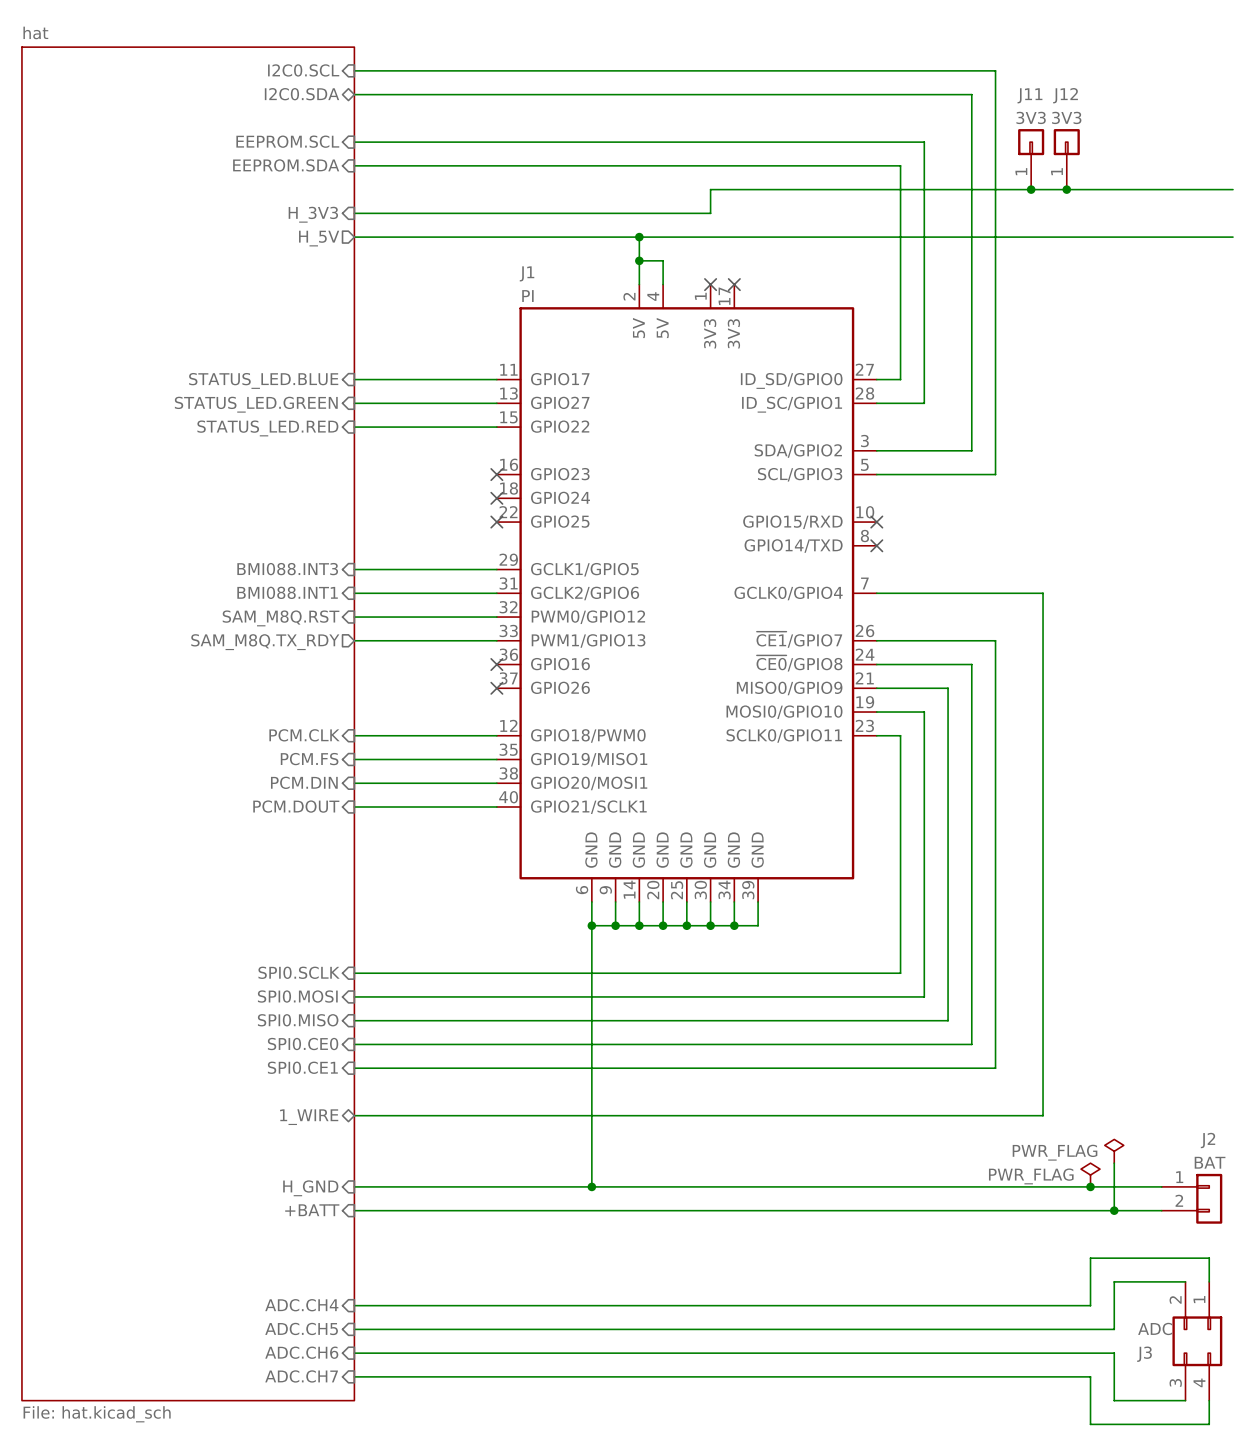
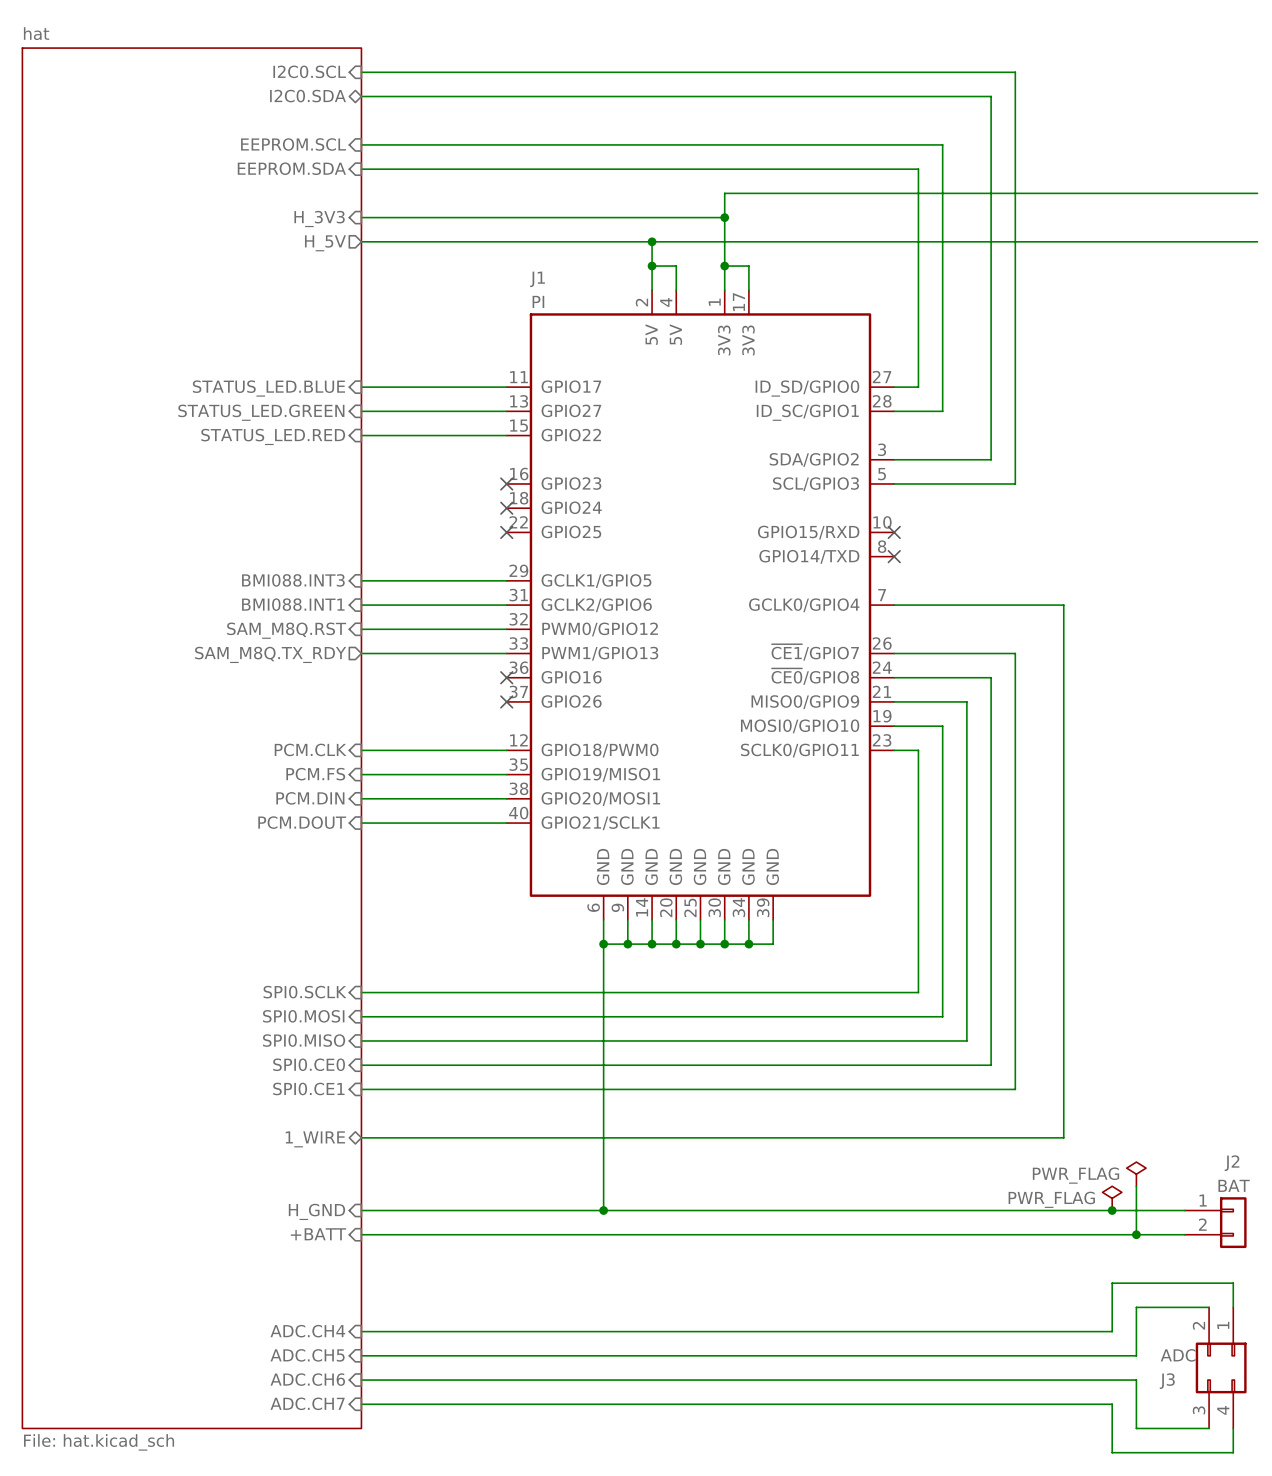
J11: 3V3 (1031, 159) -> none
J12: 3V3 (1066, 159) -> none
junction: (1031, 189) -> none
junction: (1066, 189) -> none
wire: none -> (724, 217) (724, 290)
junction: none -> (724, 217)
wire: none -> (724, 266) (748, 266) (748, 290)
junction: none -> (724, 266)
no-connect mark: (710, 284) -> none
no-connect mark: (734, 284) -> none

